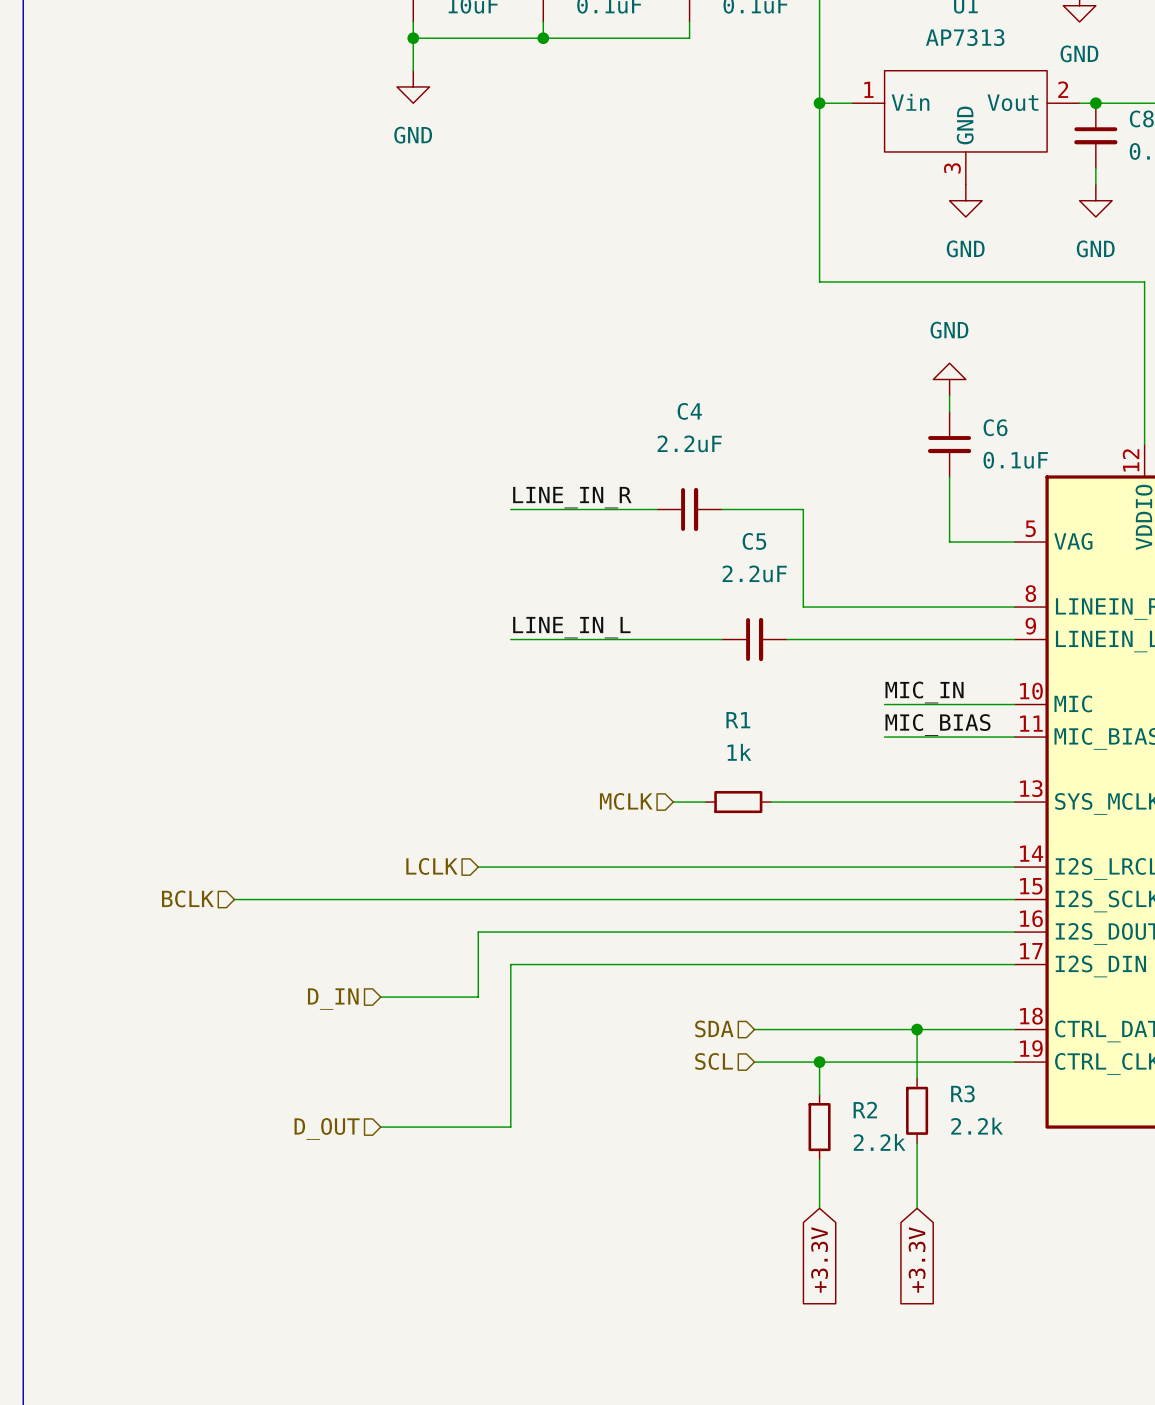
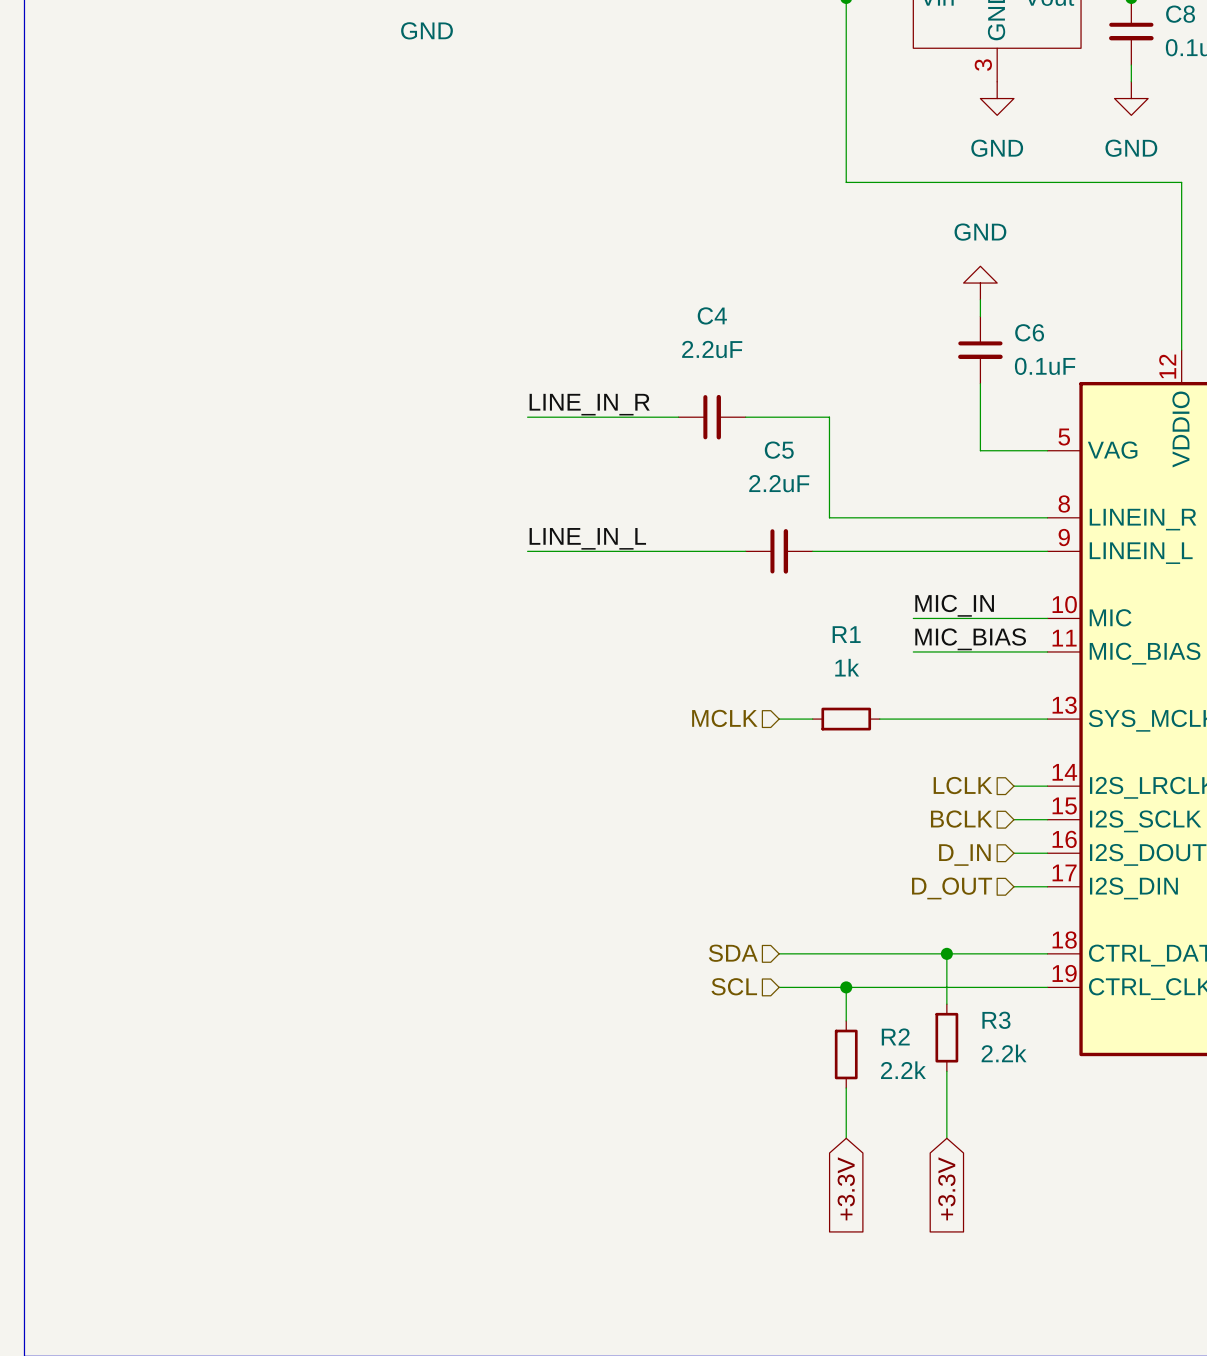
hierarchical label position: MCLK (626, 801) -> MCLK (724, 718)
wire: (673, 802) (705, 802) -> none
R1 position: (738, 802) -> (846, 719)
wire: (787, 802) (852, 802) -> none
hierarchical label: LCLK (431, 866) -> none
hierarchical label: none -> LCLK (963, 785)
wire: (478, 867) (982, 867) -> none
hierarchical label: BCLK (187, 898) -> none
hierarchical label: none -> BCLK (961, 819)
wire: (234, 899) (982, 899) -> none
wire: (982, 932) (478, 932) (478, 997) (380, 997) -> none
hierarchical label: none -> D_IN (964, 855)
wire: (982, 964) (510, 964) (510, 1127) (380, 1127) -> none
hierarchical label: none -> D_OUT (952, 888)
hierarchical label: D_IN (333, 999) -> none
hierarchical label: D_OUT (327, 1128) -> none

